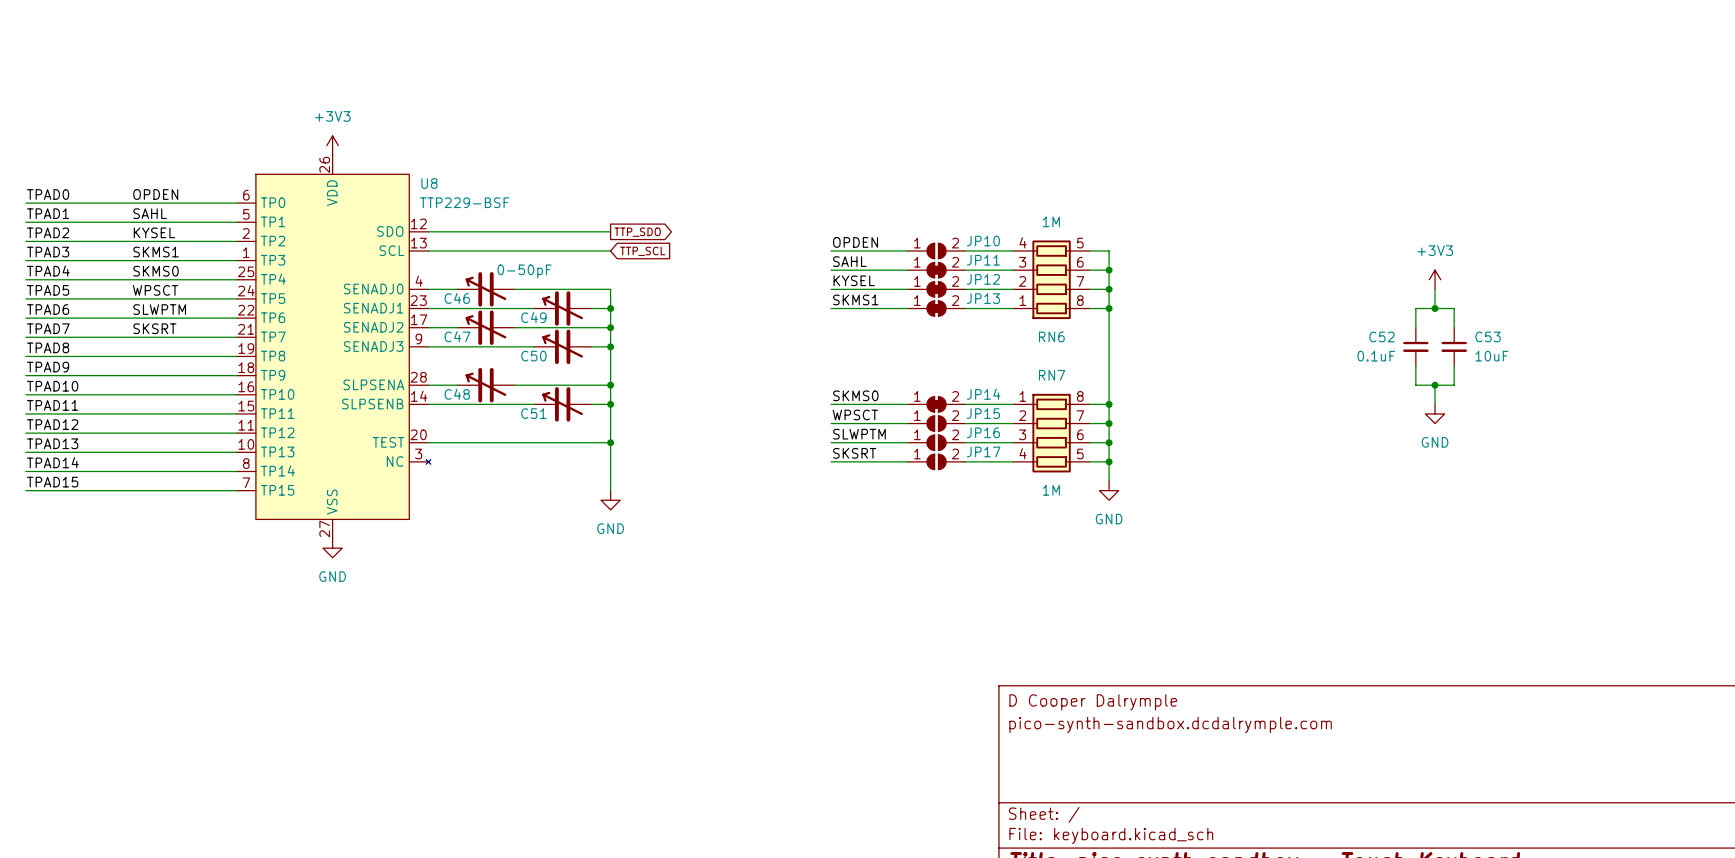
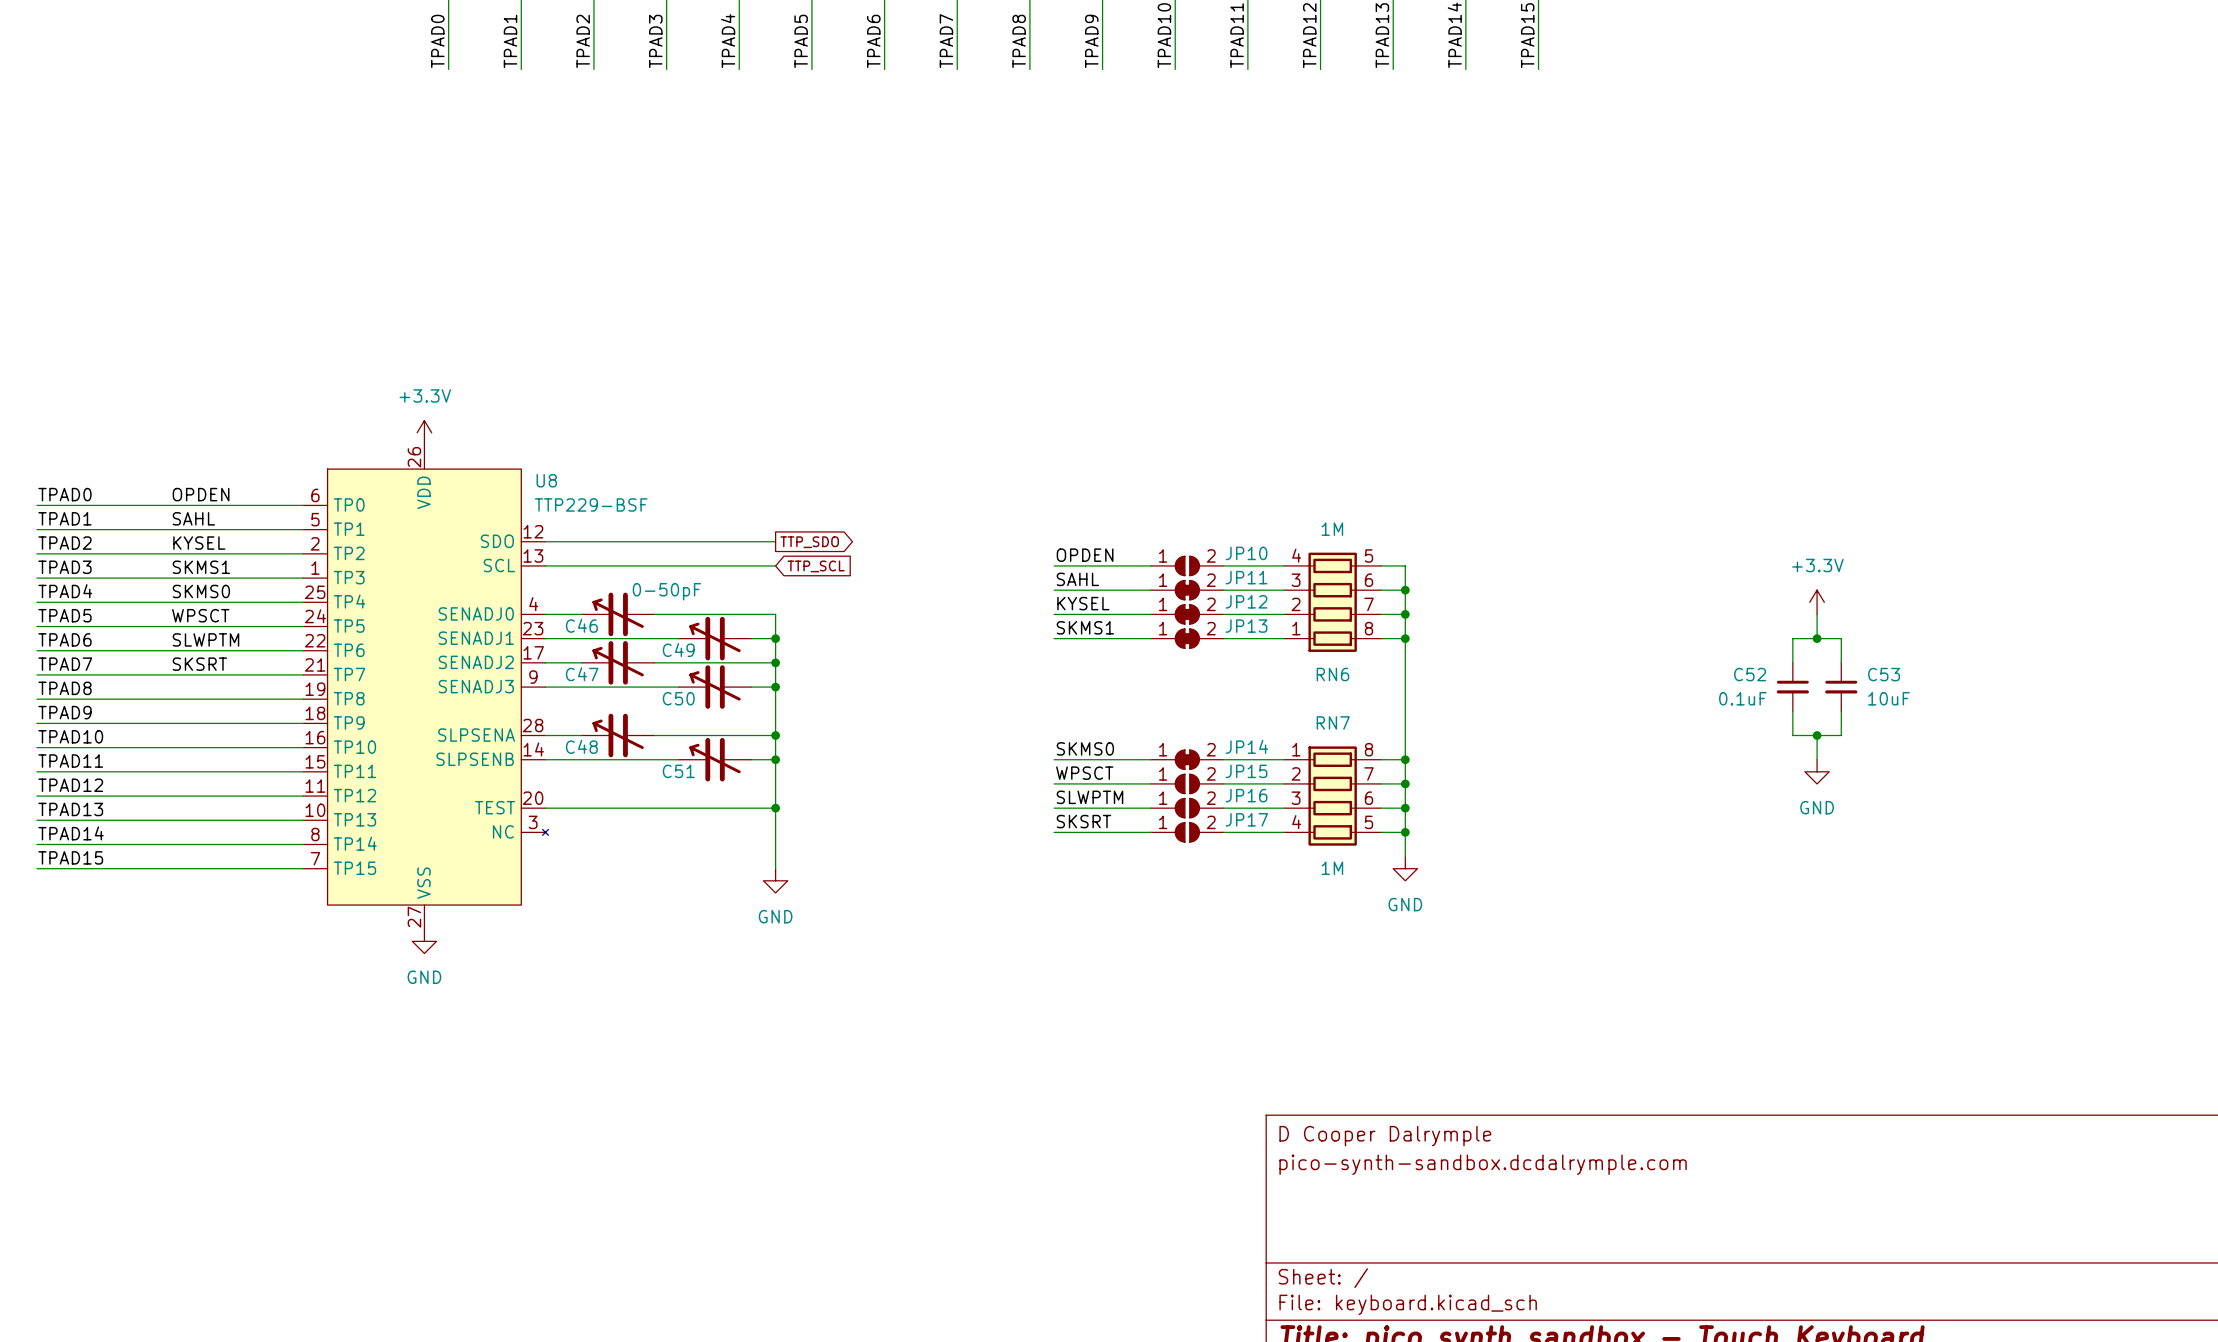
power symbol: +3V3 (332, 145) -> +3.3V (424, 432)
power symbol: +3V3 (1435, 279) -> +3.3V (1817, 602)

